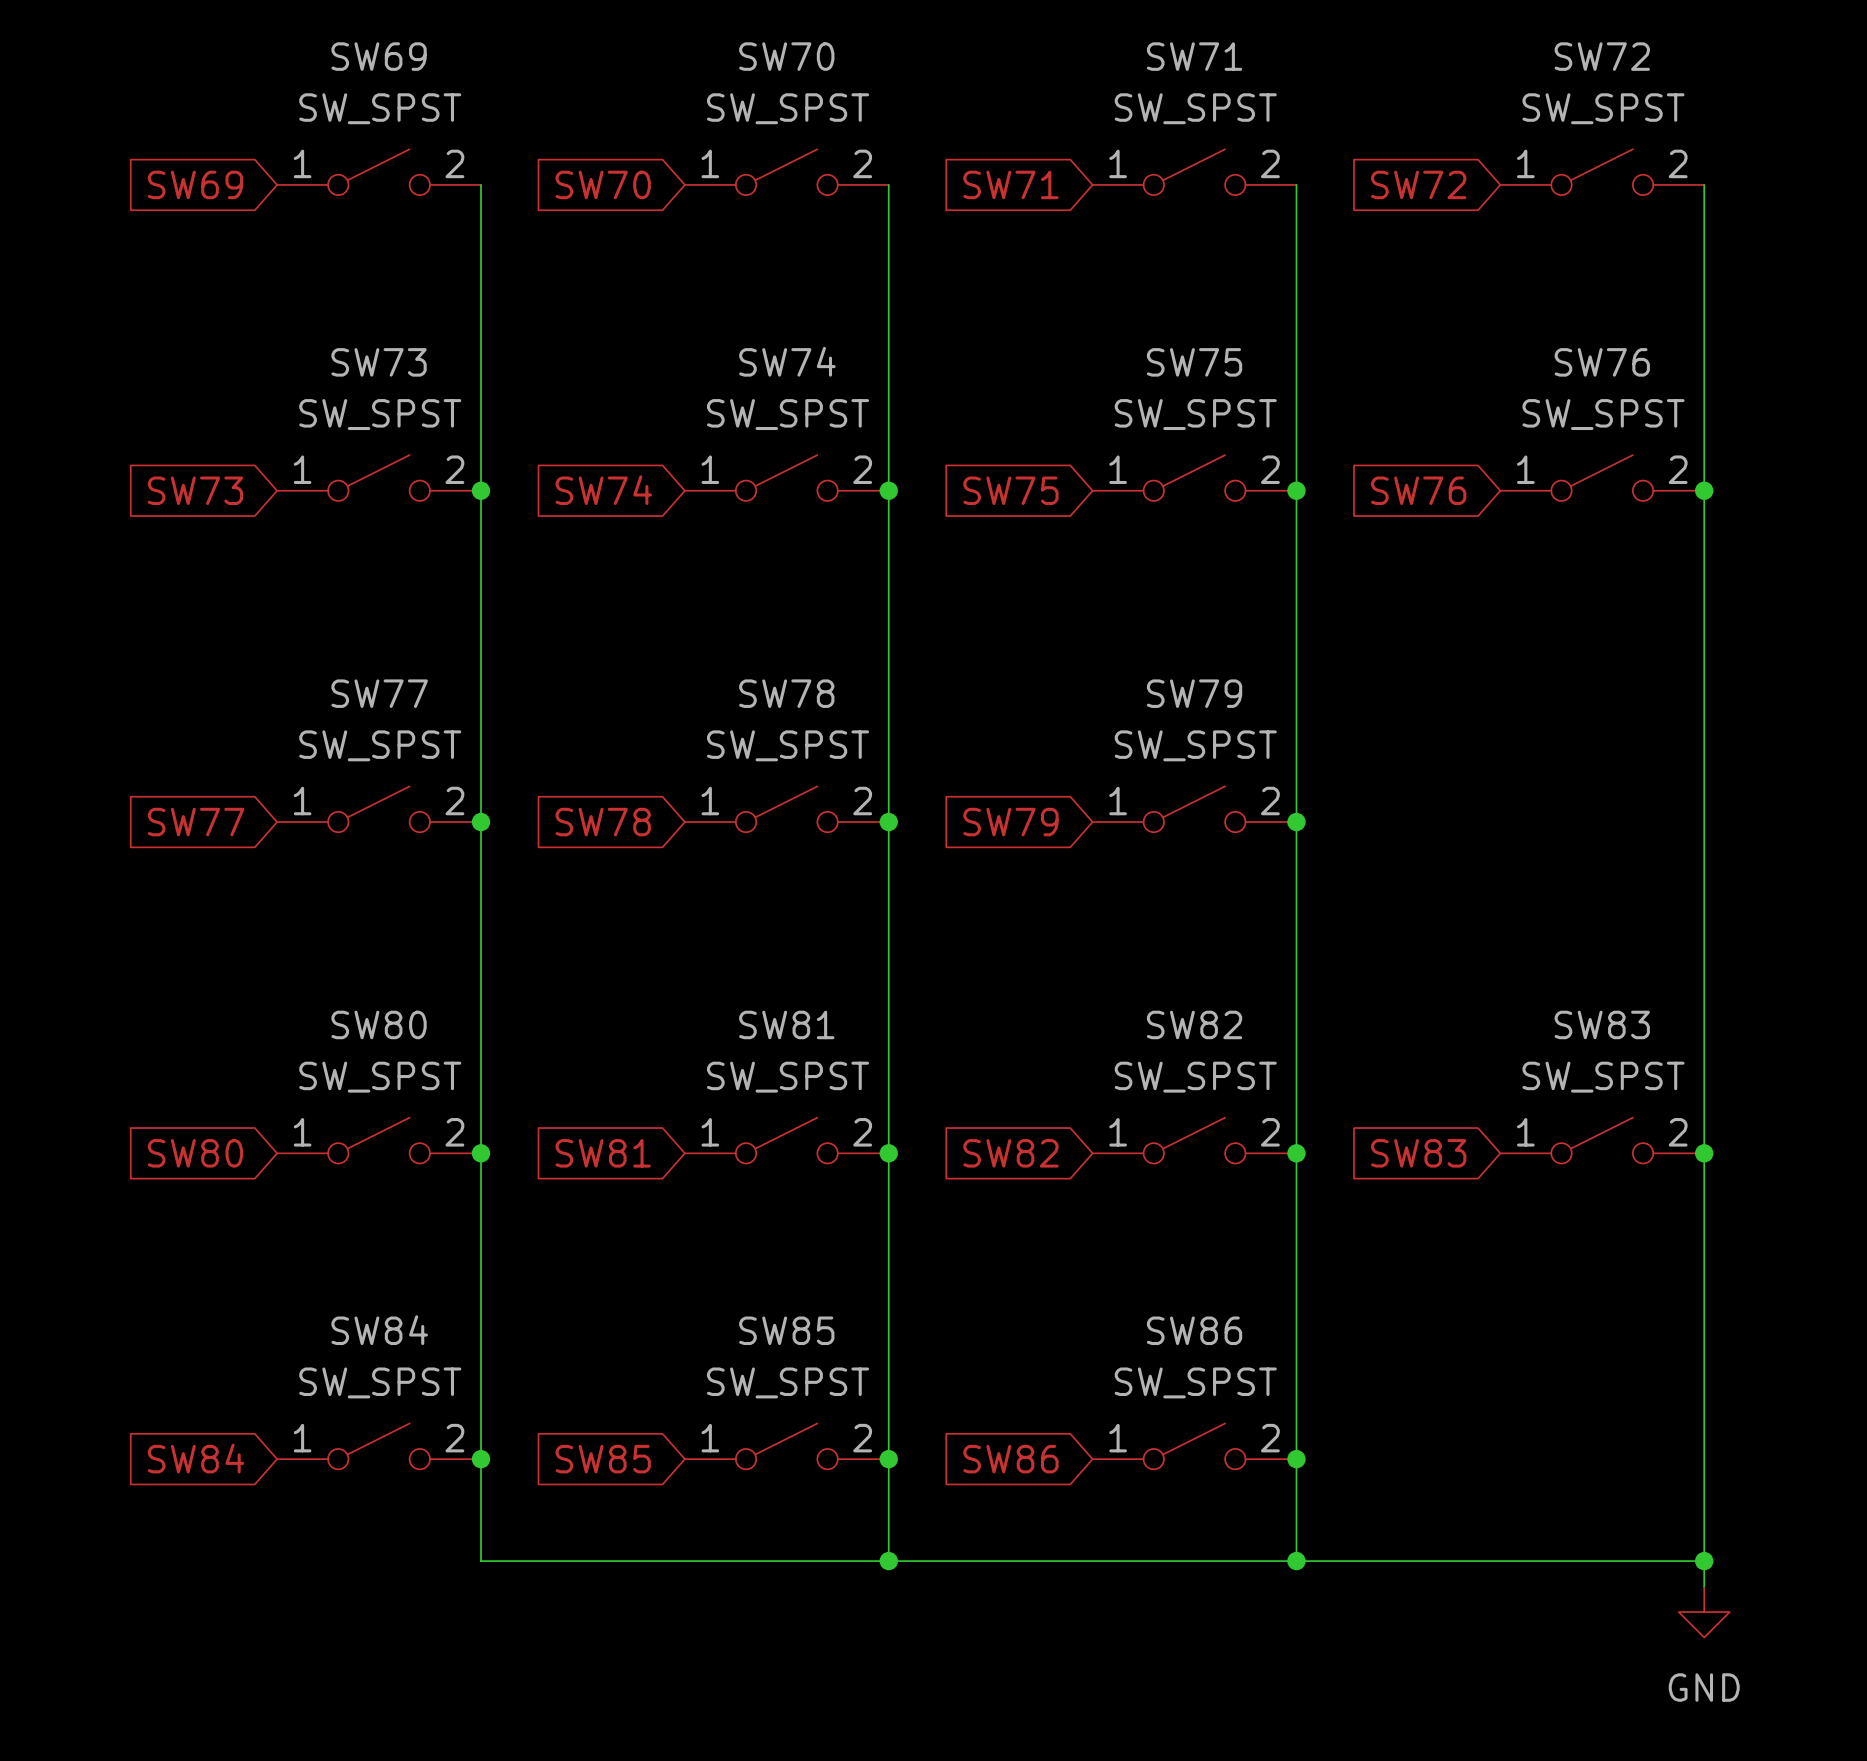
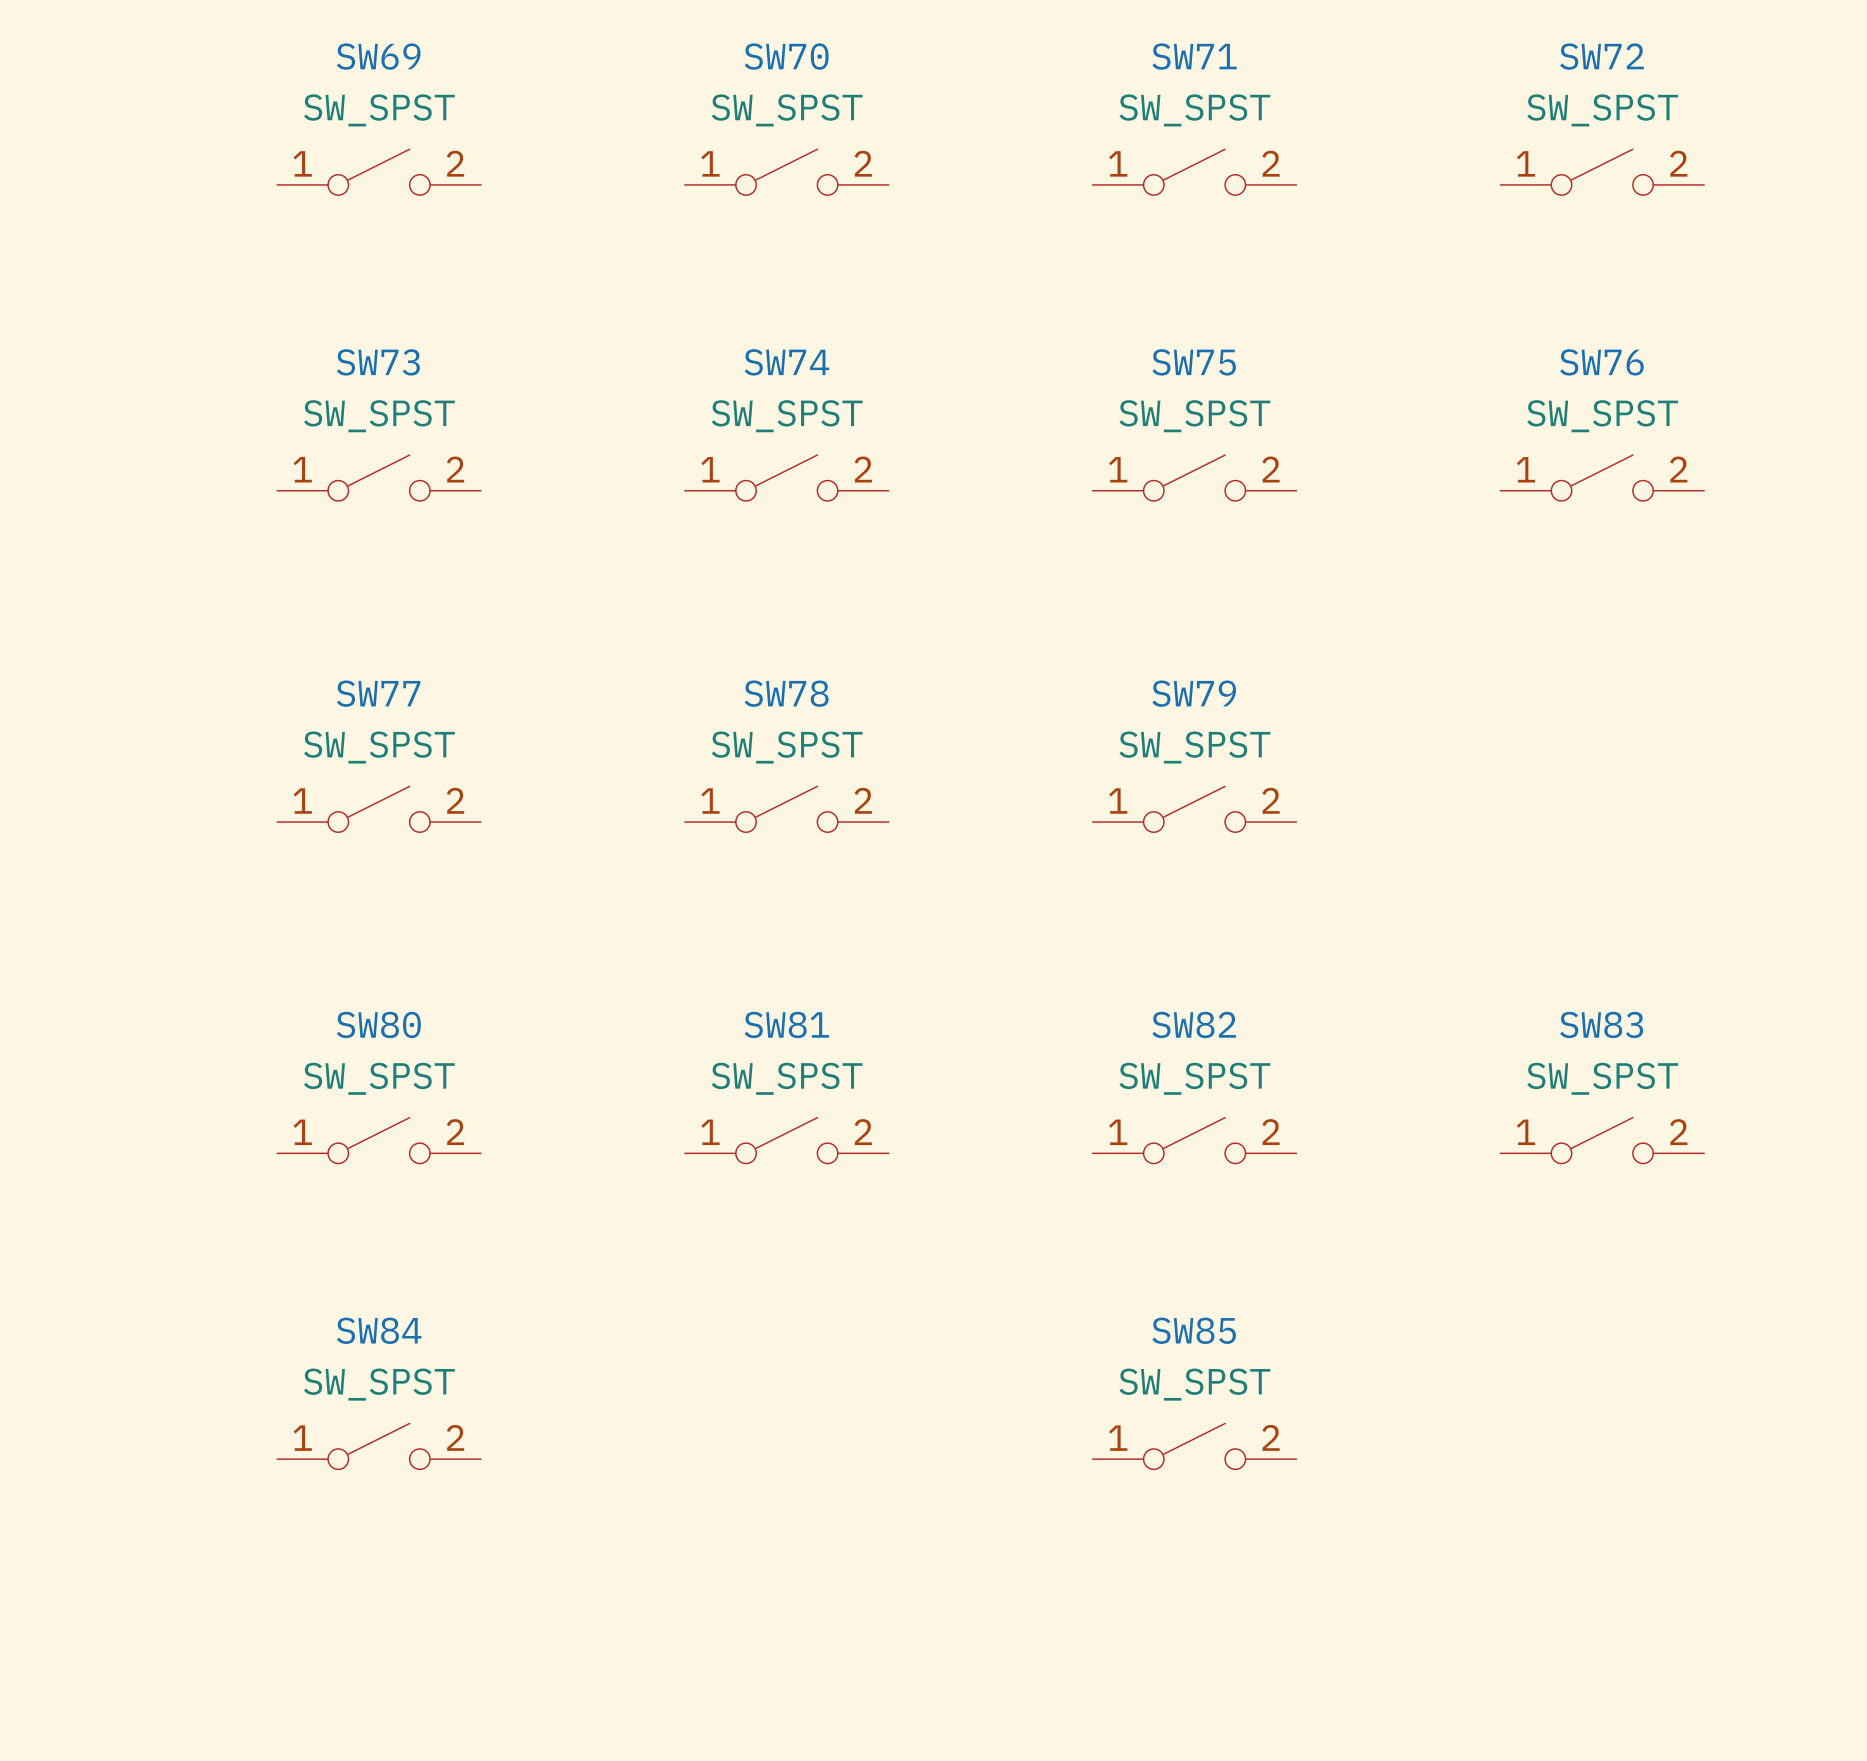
global label: SW69 (195, 184) -> none
wire: (480, 184) (480, 1561) (1704, 1561) -> none
global label: SW70 (603, 184) -> none
wire: (888, 184) (888, 1561) -> none
global label: SW71 (1010, 184) -> none
wire: (1296, 184) (1296, 1561) -> none
global label: SW72 (1418, 184) -> none
wire: (1704, 184) (1704, 1586) -> none
global label: SW73 (195, 490) -> none
junction: (480, 490) -> none
global label: SW74 (603, 490) -> none
junction: (888, 490) -> none
global label: SW75 (1010, 490) -> none
junction: (1296, 490) -> none
global label: SW76 (1418, 490) -> none
junction: (1704, 490) -> none
global label: SW77 (196, 822) -> none
junction: (480, 822) -> none
global label: SW78 (603, 822) -> none
junction: (888, 822) -> none
global label: SW79 (1010, 822) -> none
junction: (1296, 822) -> none
global label: SW80 (195, 1153) -> none
junction: (480, 1153) -> none
global label: SW81 (603, 1153) -> none
junction: (888, 1153) -> none
global label: SW82 (1010, 1153) -> none
junction: (1296, 1153) -> none
global label: SW83 (1418, 1153) -> none
junction: (1704, 1153) -> none
SW86 name: SW86 (1194, 1330) -> SW85 (1194, 1330)
SW85: SW_SPST (786, 1446) -> none
global label: SW84 (196, 1458) -> none
junction: (480, 1459) -> none
global label: SW85 (603, 1459) -> none
junction: (888, 1459) -> none
global label: SW86 (1010, 1459) -> none
junction: (1296, 1459) -> none
junction: (888, 1561) -> none
junction: (1296, 1561) -> none
junction: (1704, 1561) -> none
power symbol: GND (1704, 1612) -> none

